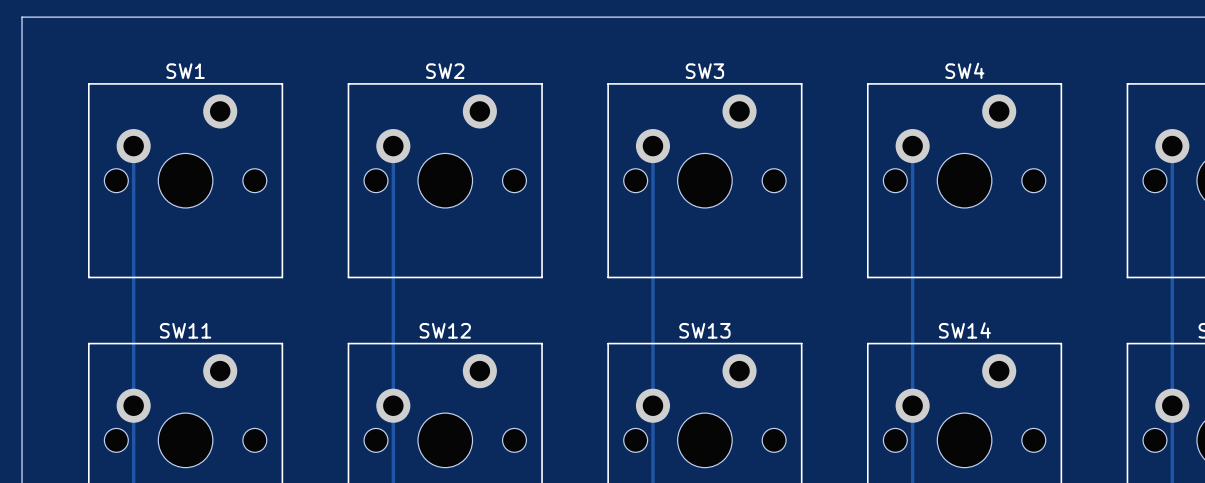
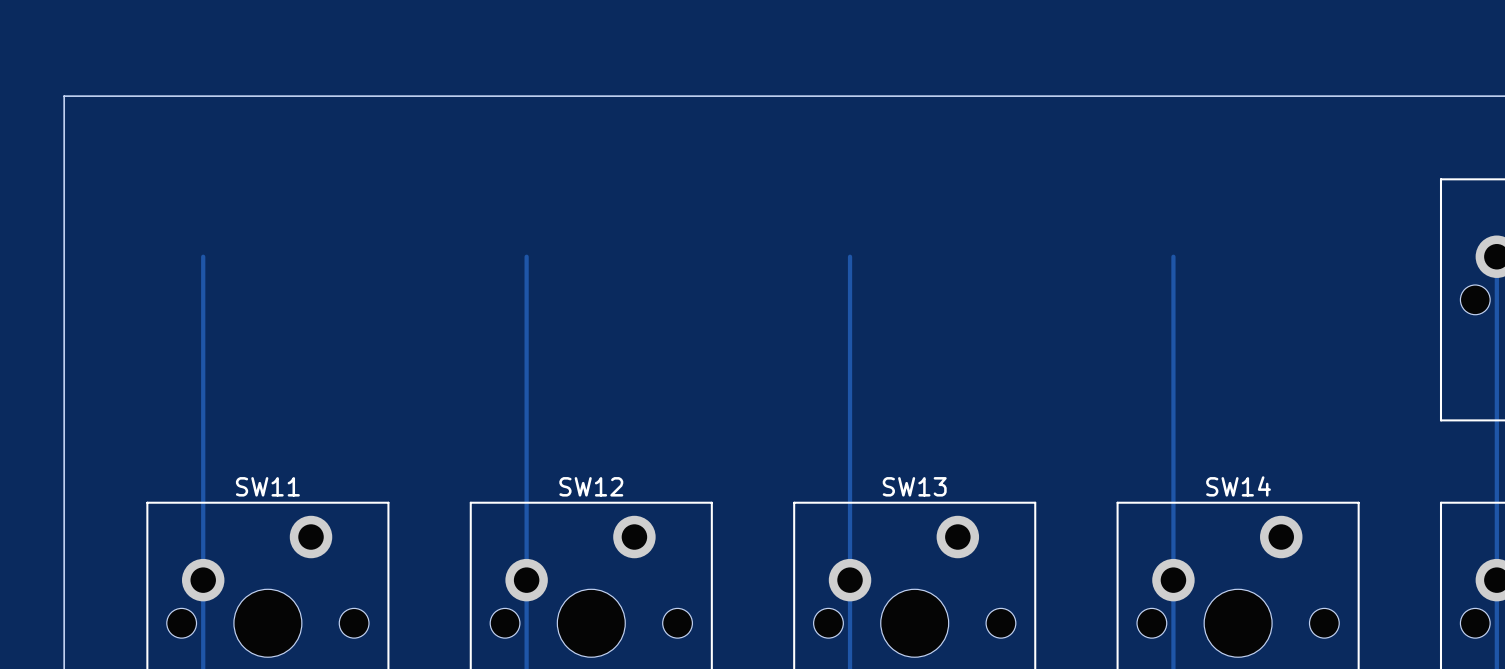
SW1: (185, 180) -> none
SW2: (445, 180) -> none
SW3: (704, 180) -> none
SW4: (964, 180) -> none

